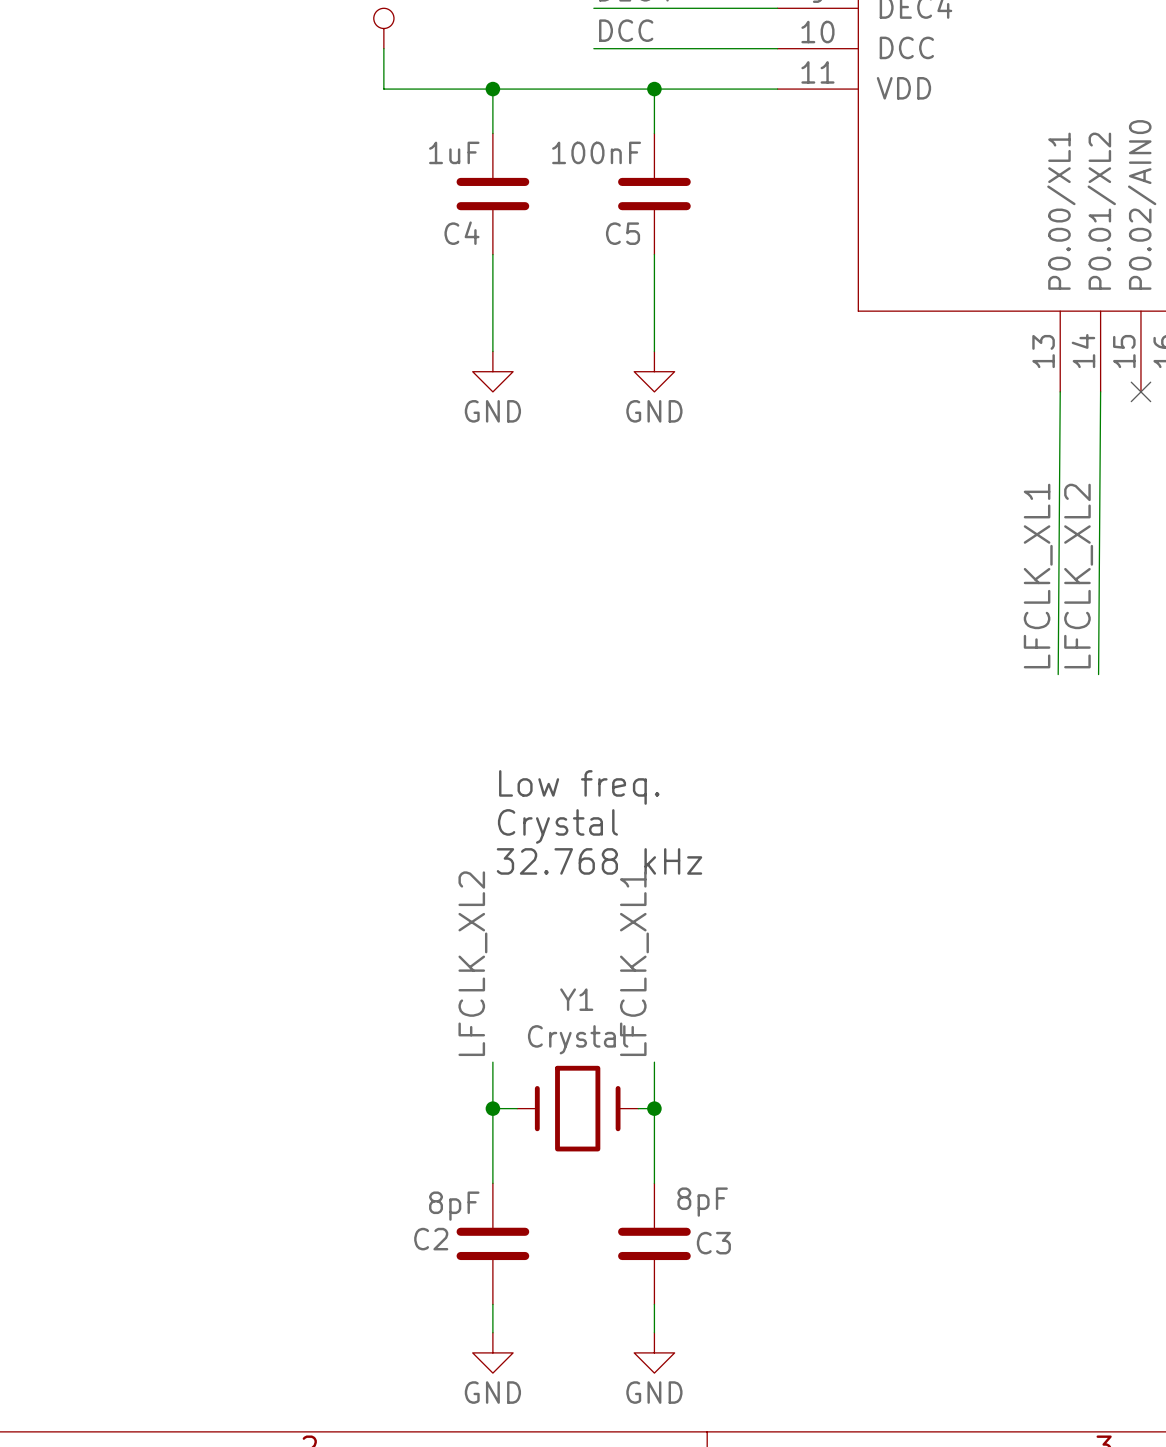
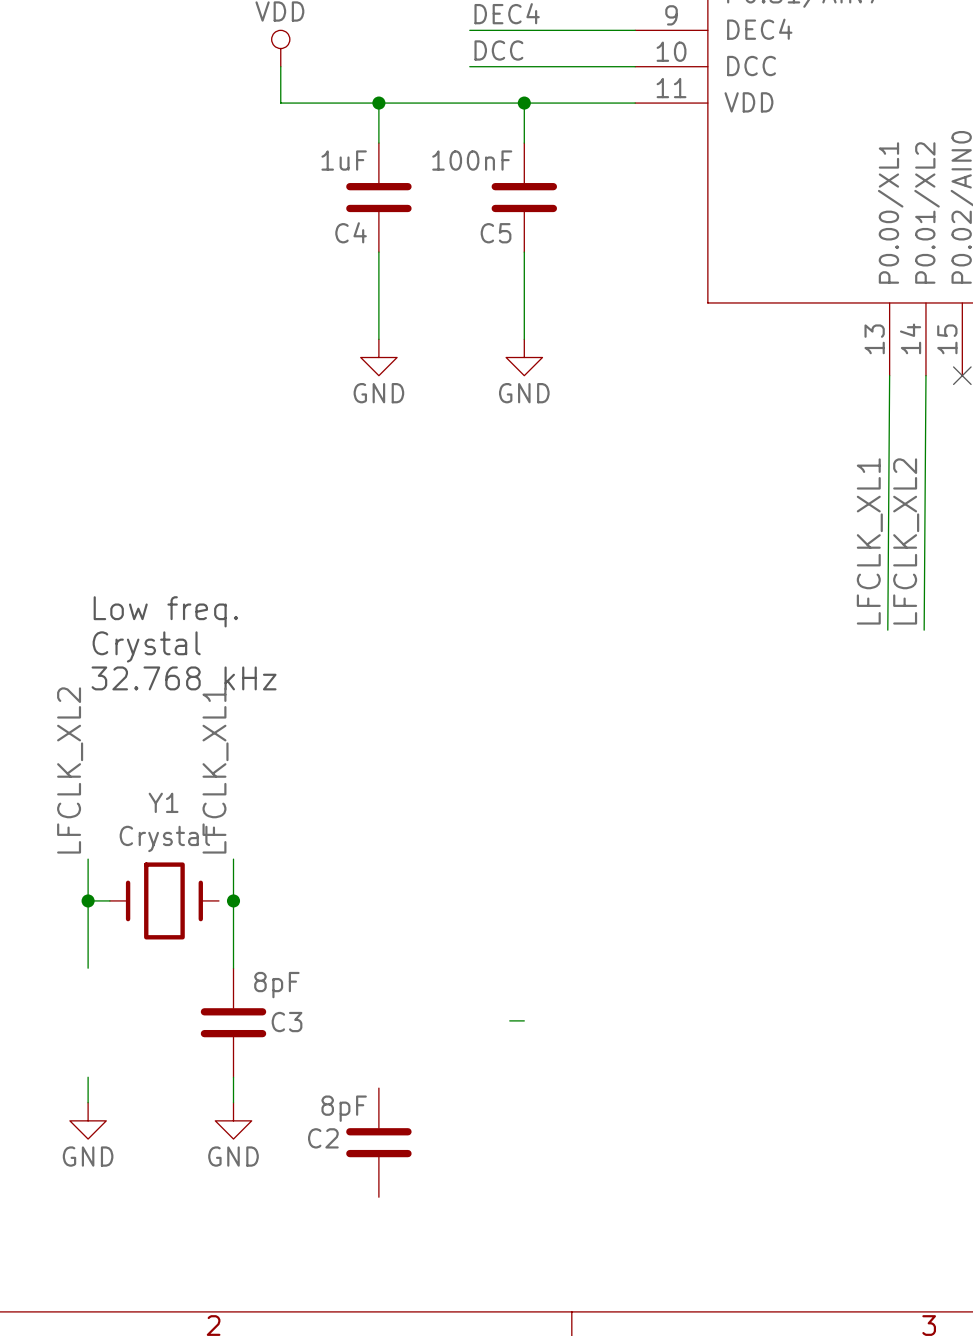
text position: Low freq. (579, 787) -> Low freq. (165, 611)
text position: Crystal (557, 826) -> Crystal (146, 646)
text position: 32.768 kHz (599, 861) -> 32.768 kHz (184, 678)
label position: LFCLK_XL2 (472, 963) -> LFCLK_XL2 (70, 770)
label position: LFCLK_XL1 (634, 963) -> LFCLK_XL1 (215, 770)
junction: none -> (88, 900)
junction: none -> (233, 900)
wire: (492, 1062) (492, 1183) -> (88, 859) (88, 968)
wire: (654, 1062) (654, 1183) -> (233, 859) (233, 968)
wire: (492, 1108) (517, 1108) -> (88, 900) (109, 900)
junction: (492, 1108) -> none
Y1 position: (577, 1108) -> (164, 900)
junction: (654, 1108) -> none
power symbol: none -> GND (88, 1120)
power symbol: none -> GND (233, 1120)
C3 position: (654, 1243) -> (233, 1022)
wire: (492, 1304) (492, 1332) -> (88, 1077) (88, 1102)
wire: (654, 1304) (654, 1332) -> (233, 1077) (233, 1102)
power symbol: GND (492, 1352) -> none
power symbol: GND (654, 1352) -> none

